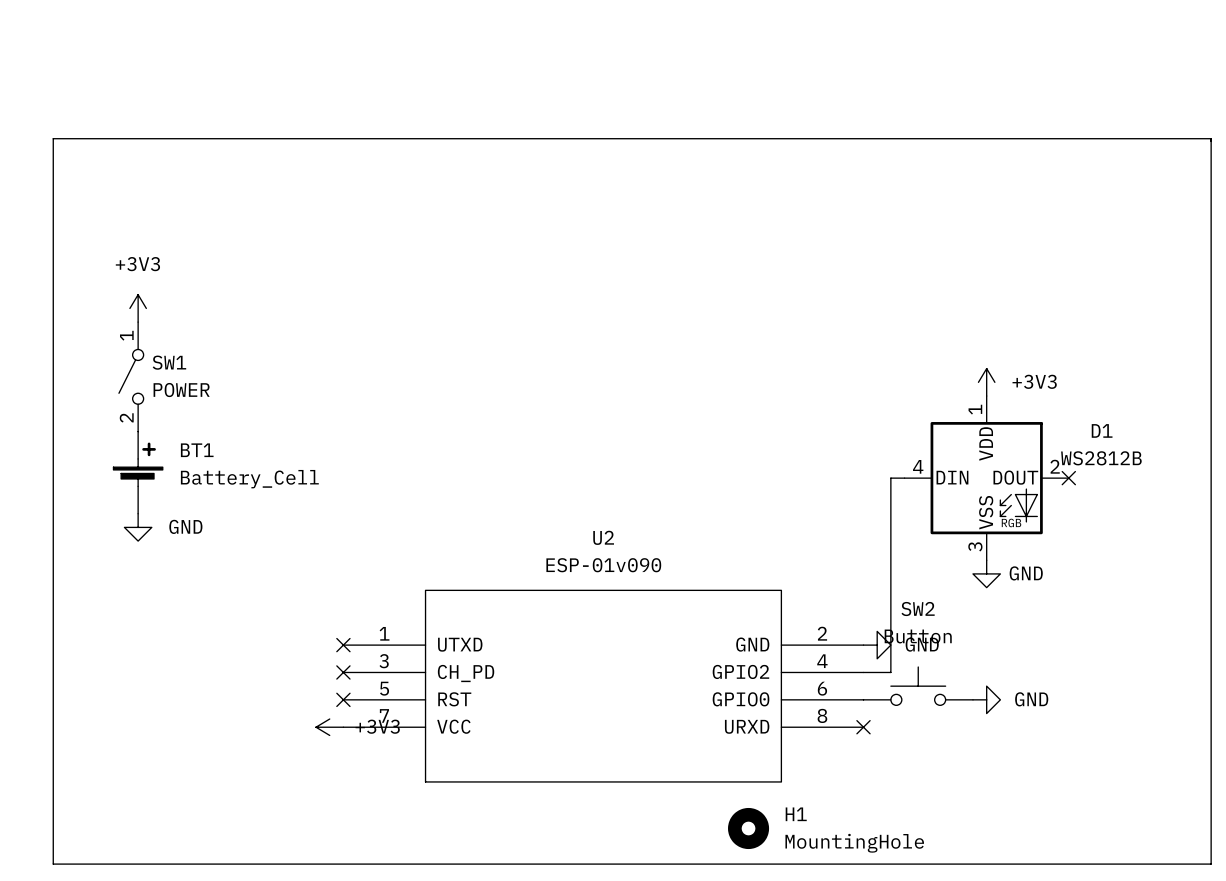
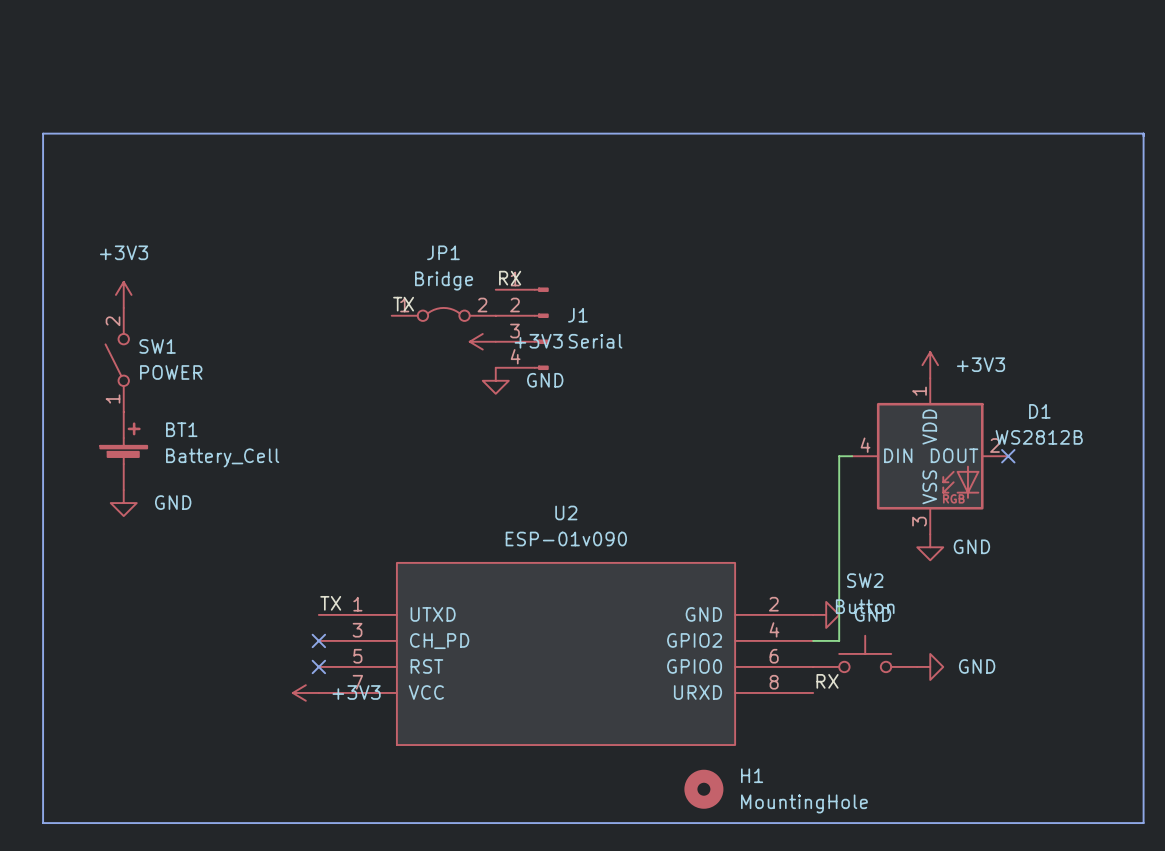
label: none -> RX (510, 278)
label: none -> TX (403, 304)
JP1: none -> Bridge (443, 314)
J1: none -> Serial (522, 328)
power symbol: none -> +3V3 (482, 341)
SW1 flip: as is (131, 376) -> up-down (117, 359)
power symbol: none -> GND (495, 380)
label: none -> TX (330, 603)
no-connect mark: (343, 645) -> none
label: none -> RX (827, 681)
no-connect mark: (863, 727) -> none

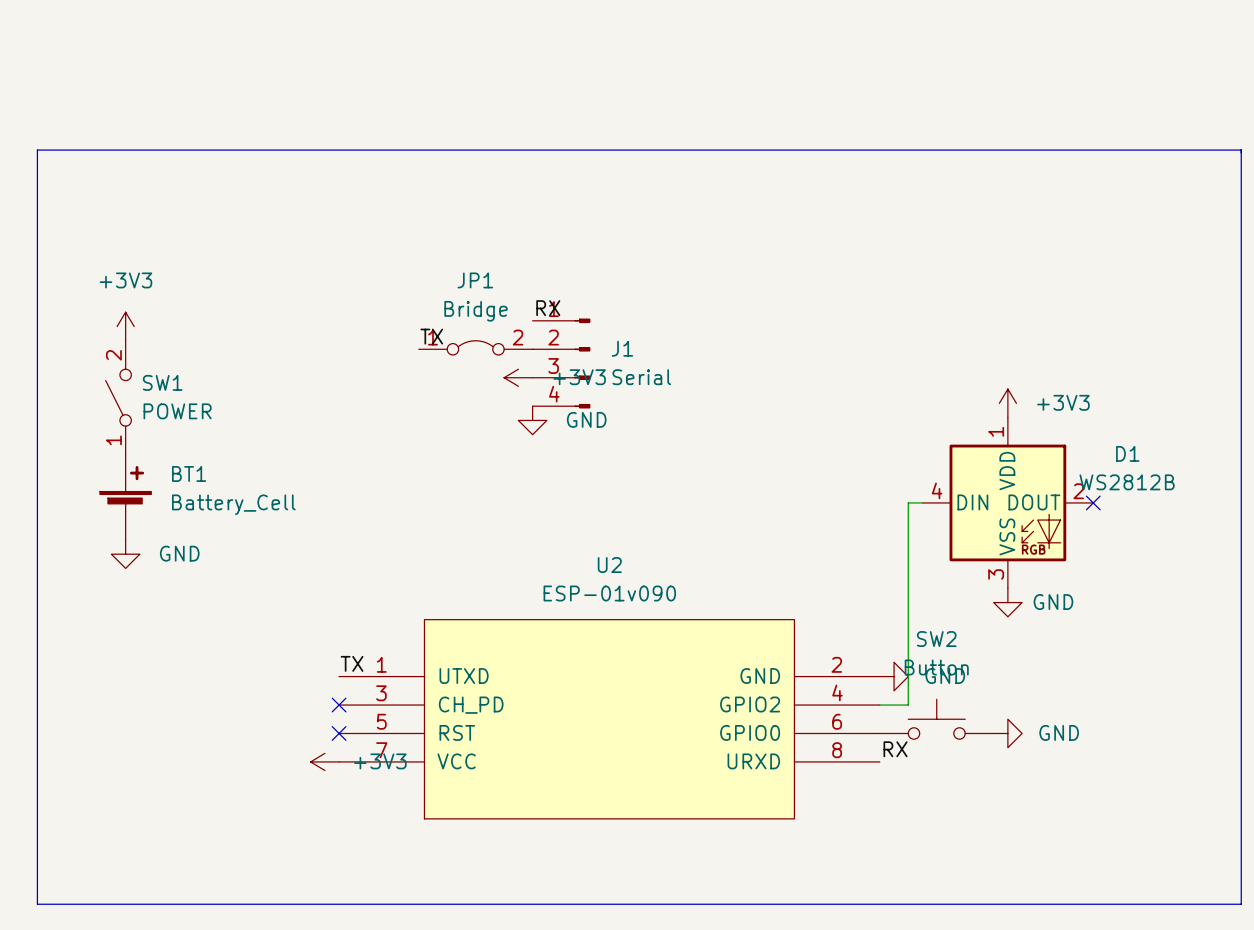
H1: MountingHole (703, 789) -> none

